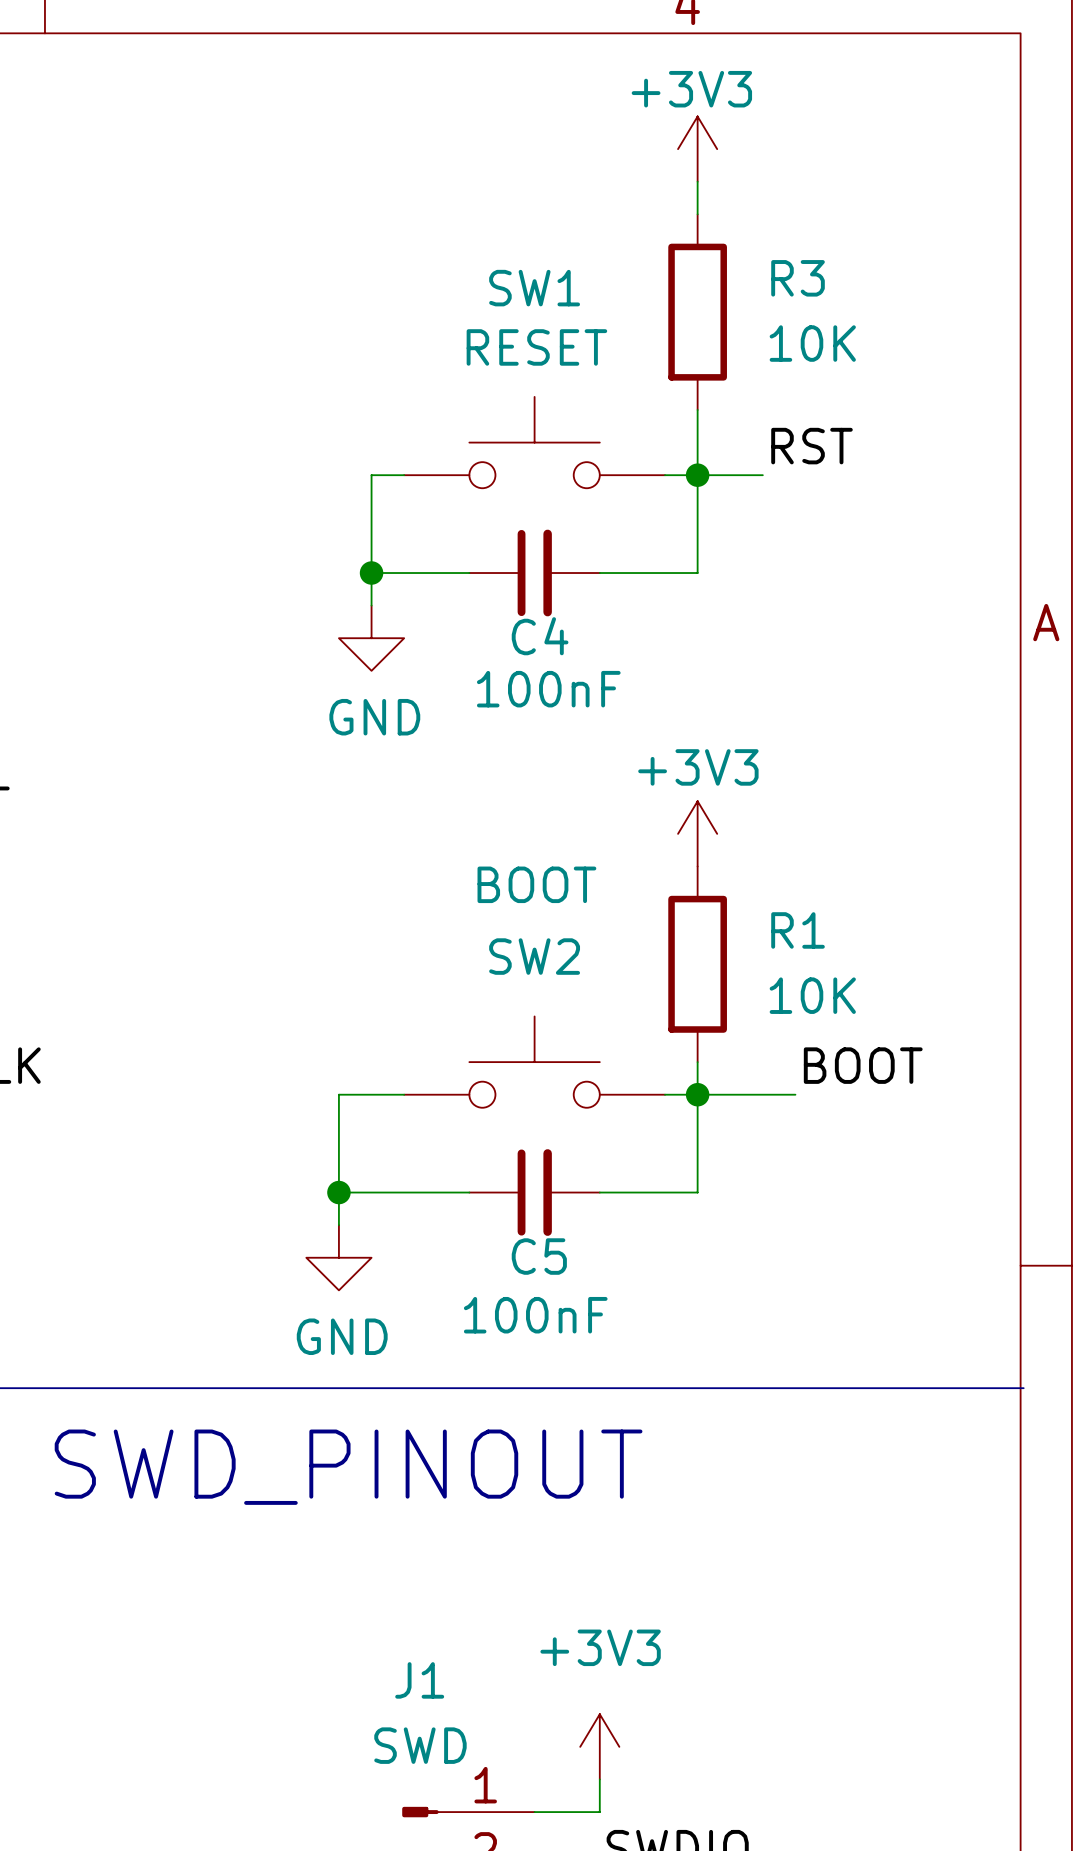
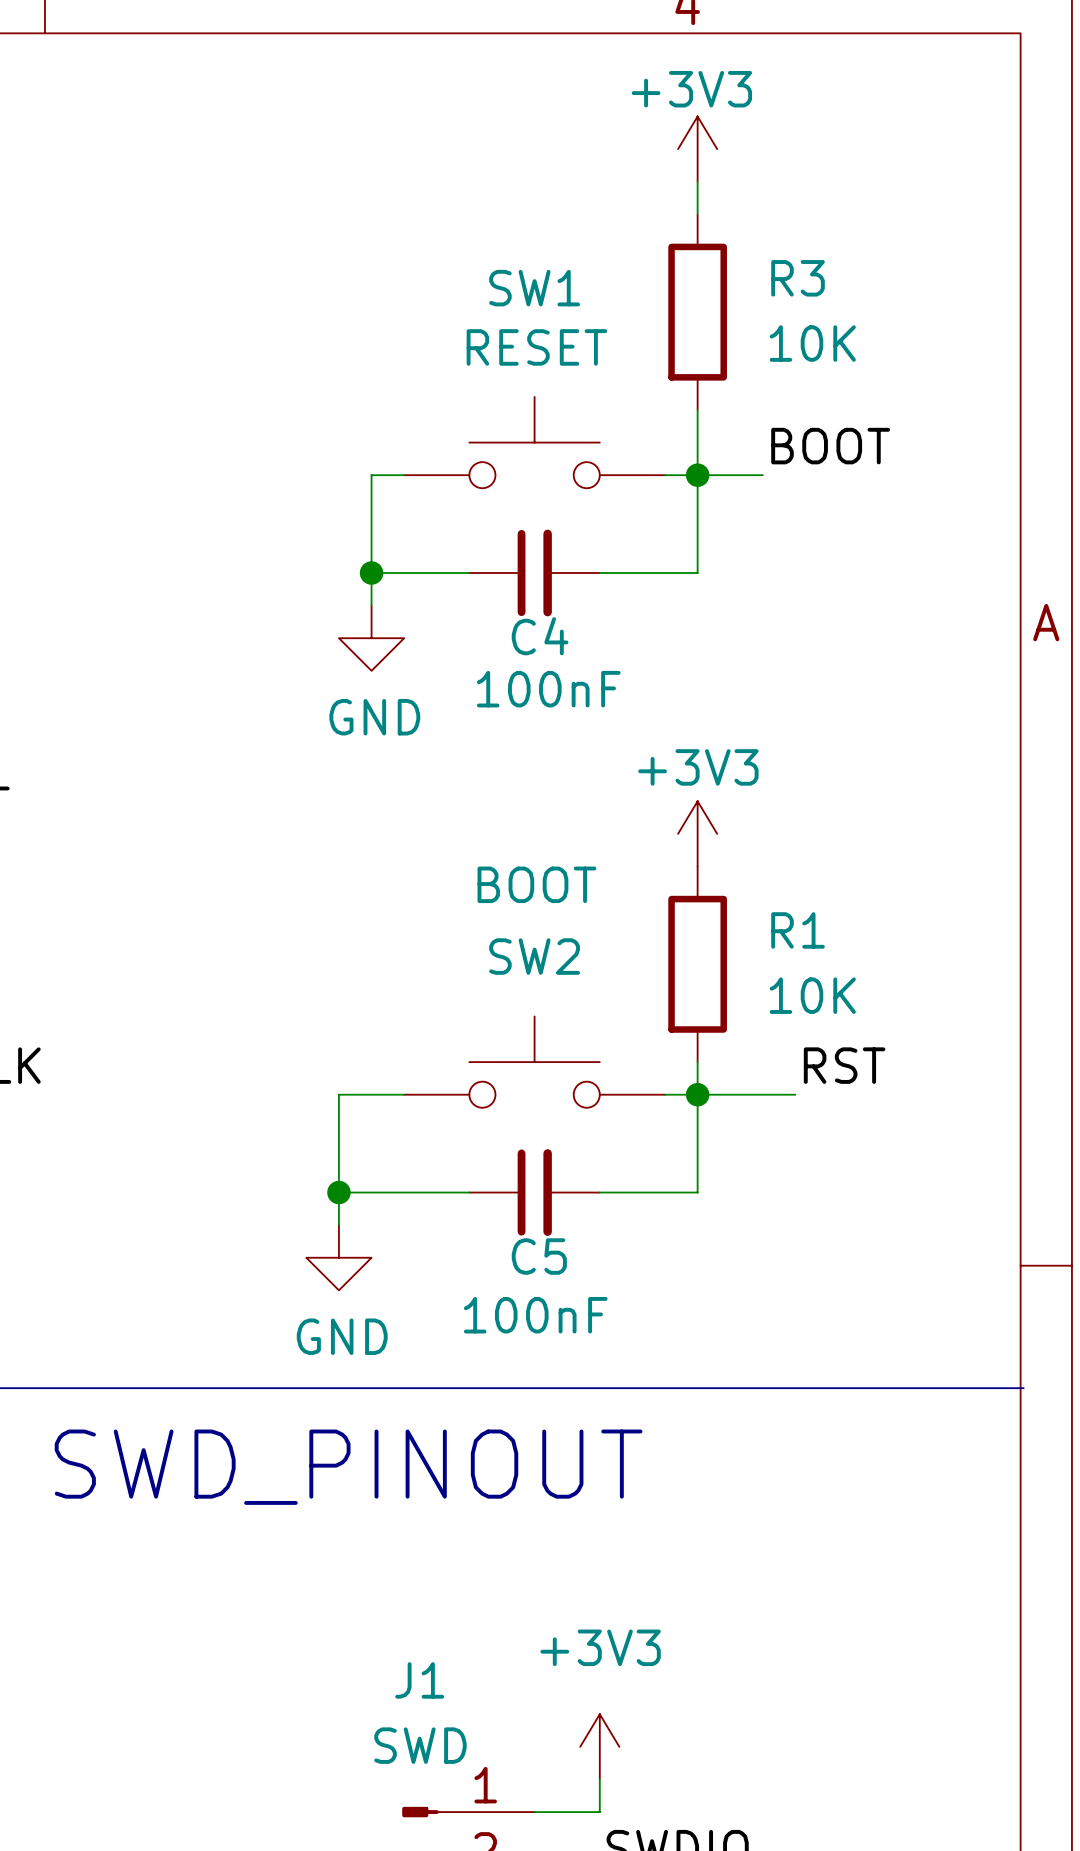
label: RST (811, 446) -> BOOT (830, 446)
label: BOOT (863, 1065) -> RST (844, 1065)

